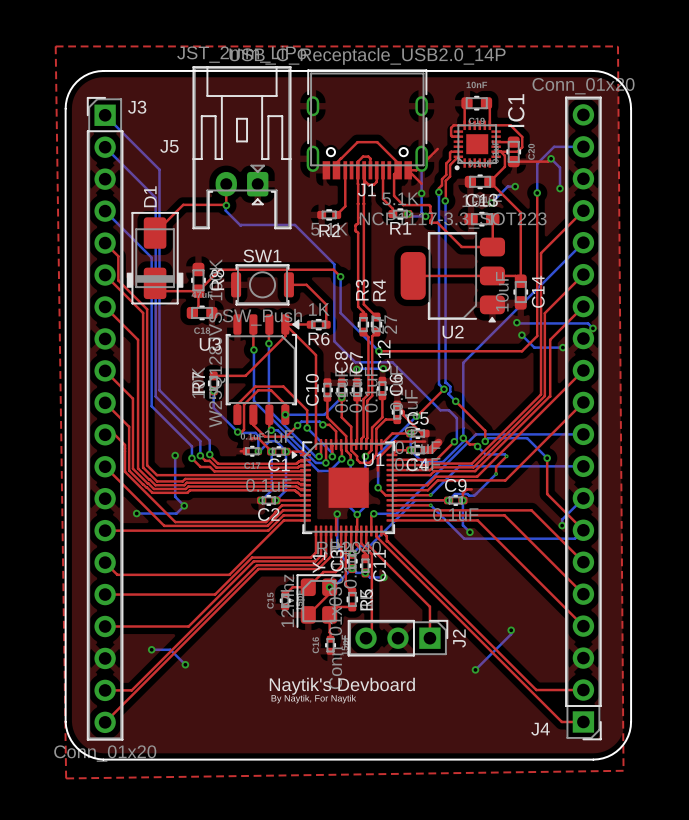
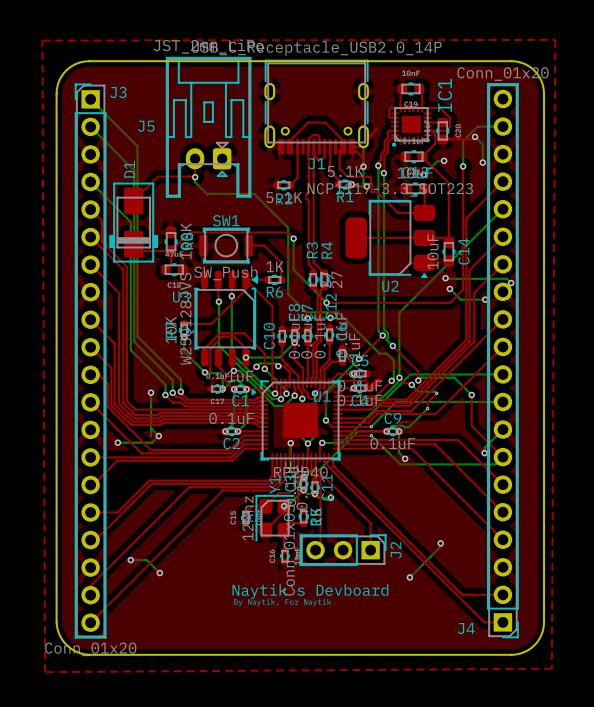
top zone outline: (55, 46) (66, 778) (623, 770) (618, 46) (55, 46) -> (555, 39) (42, 40) (45, 672) (551, 668) (555, 39)
bottom track: none -> (151, 428) (151, 436)
top track: (269, 534) (229, 574) (117, 574) (105, 562) -> (232, 460) (117, 460) (96, 481) (96, 487)
top track: (252, 557) (215, 594) (136, 594) -> (217, 480) (149, 480) (117, 512)
top track: (253, 561) (188, 626) (110, 626) -> (218, 483) (151, 483) (95, 540)
top track: (256, 565) (131, 690) (105, 690) -> (221, 487) (189, 487) (90, 585) (90, 595)

